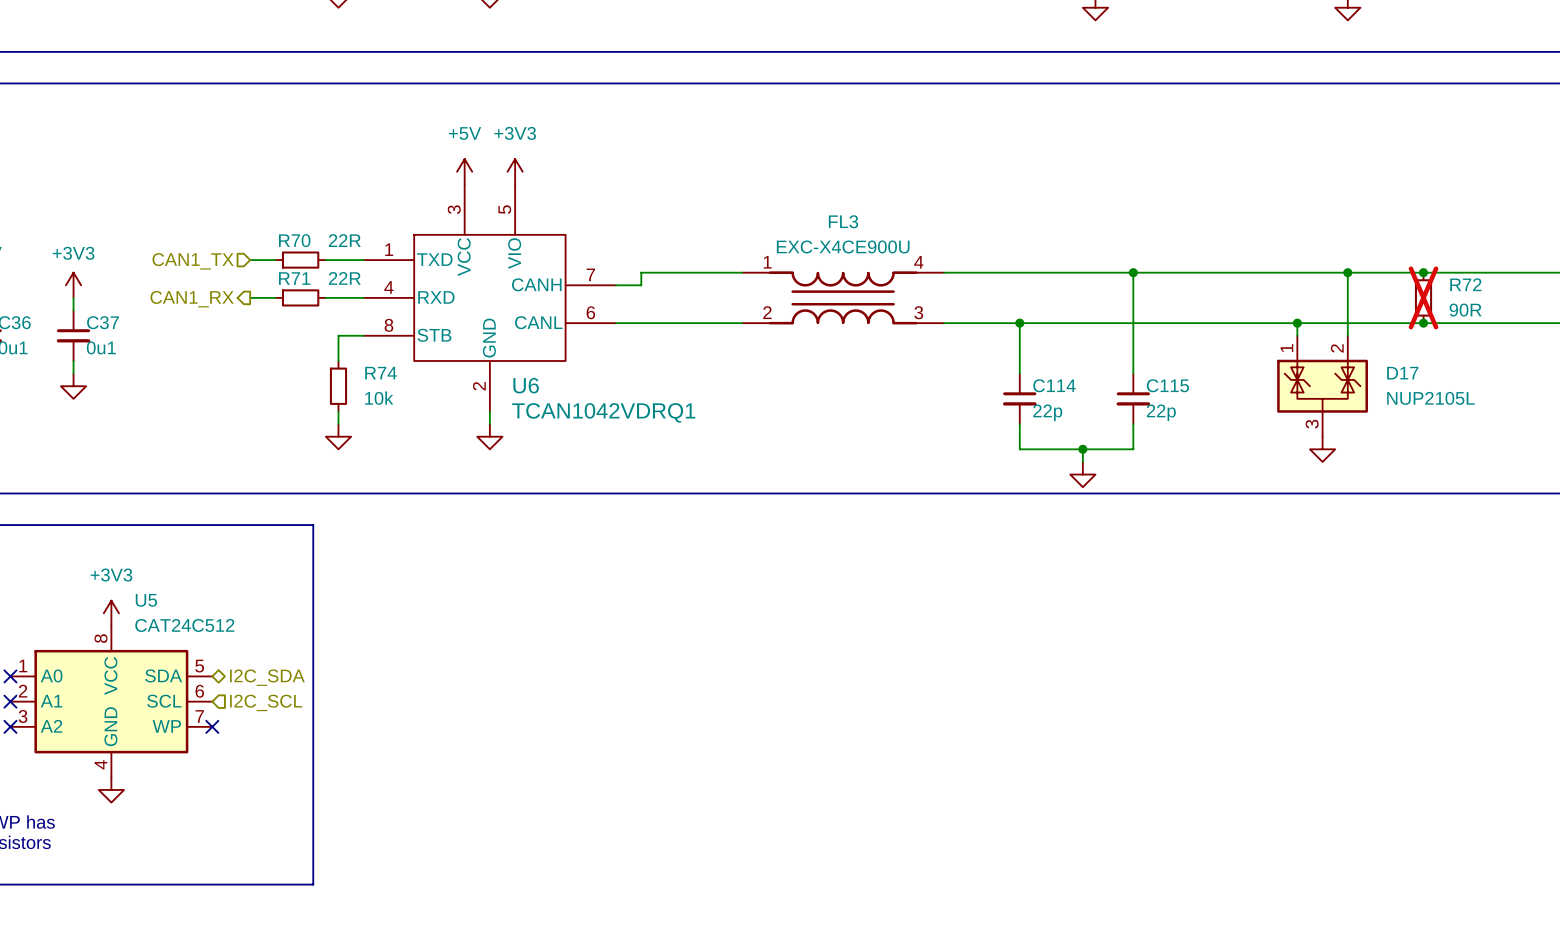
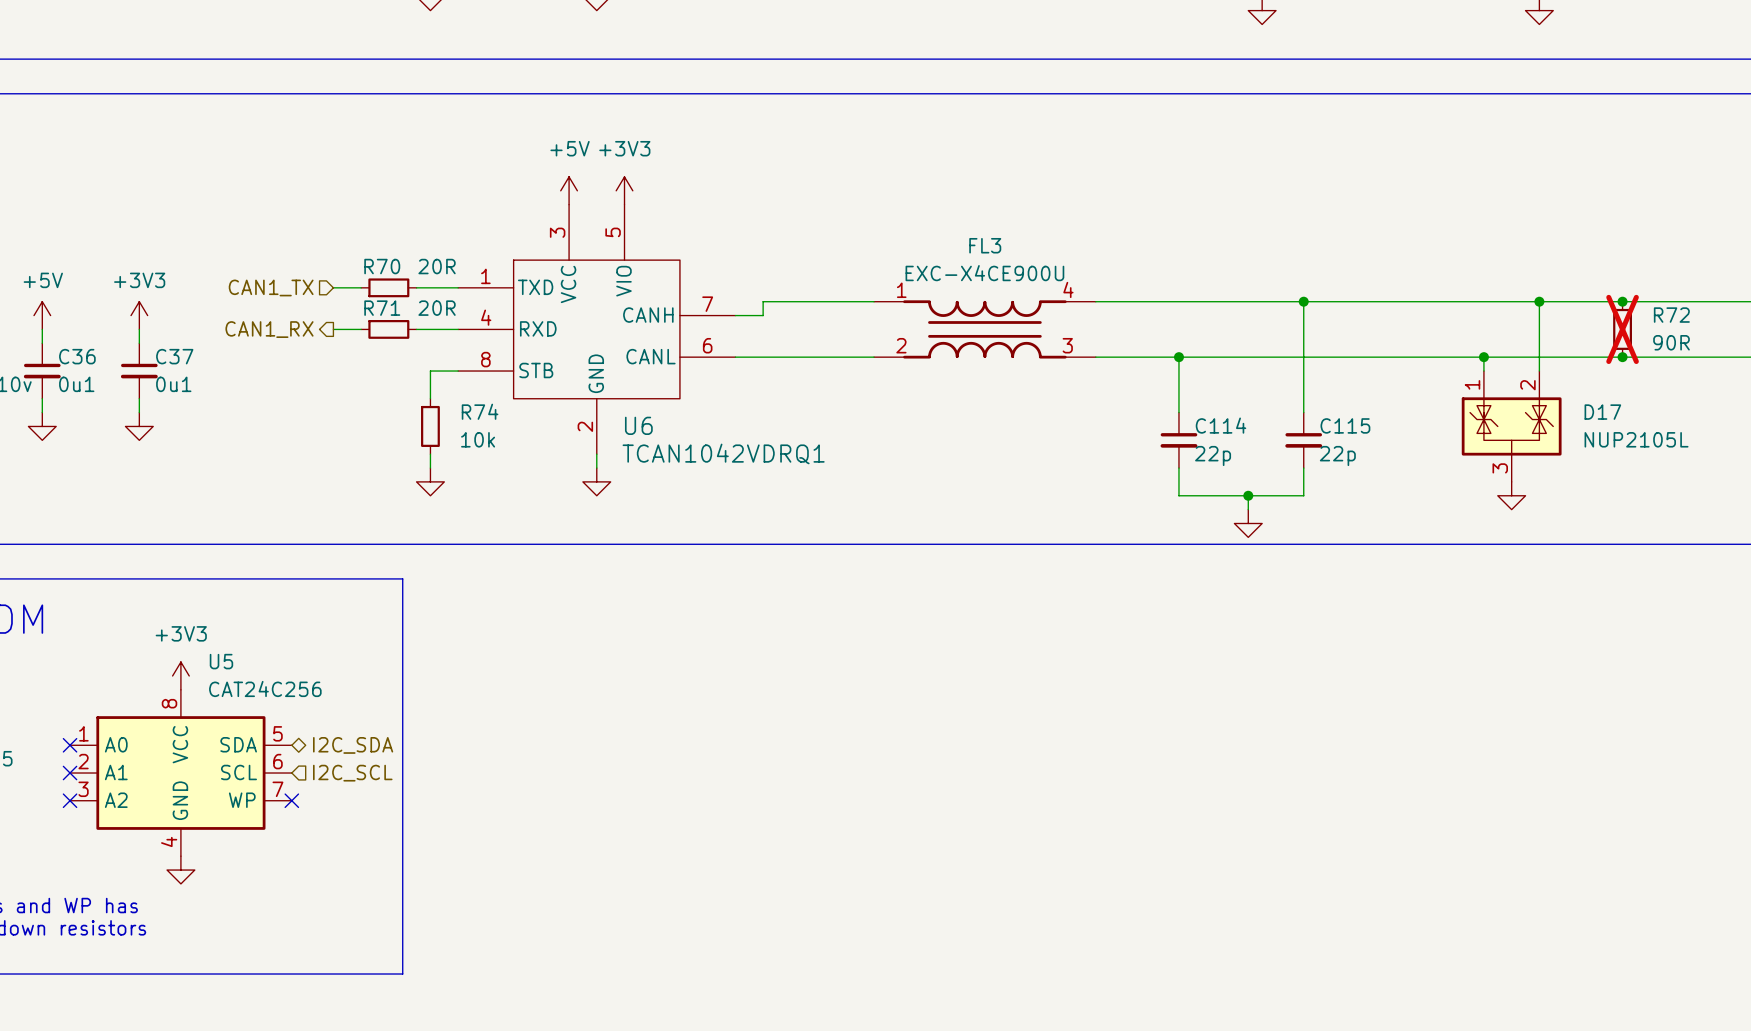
R70 value: 22R (344, 240) -> 20R (437, 266)
R71 value: 22R (344, 278) -> 20R (437, 308)
U5 value: CAT24C512 (184, 625) -> CAT24C256 (265, 688)

